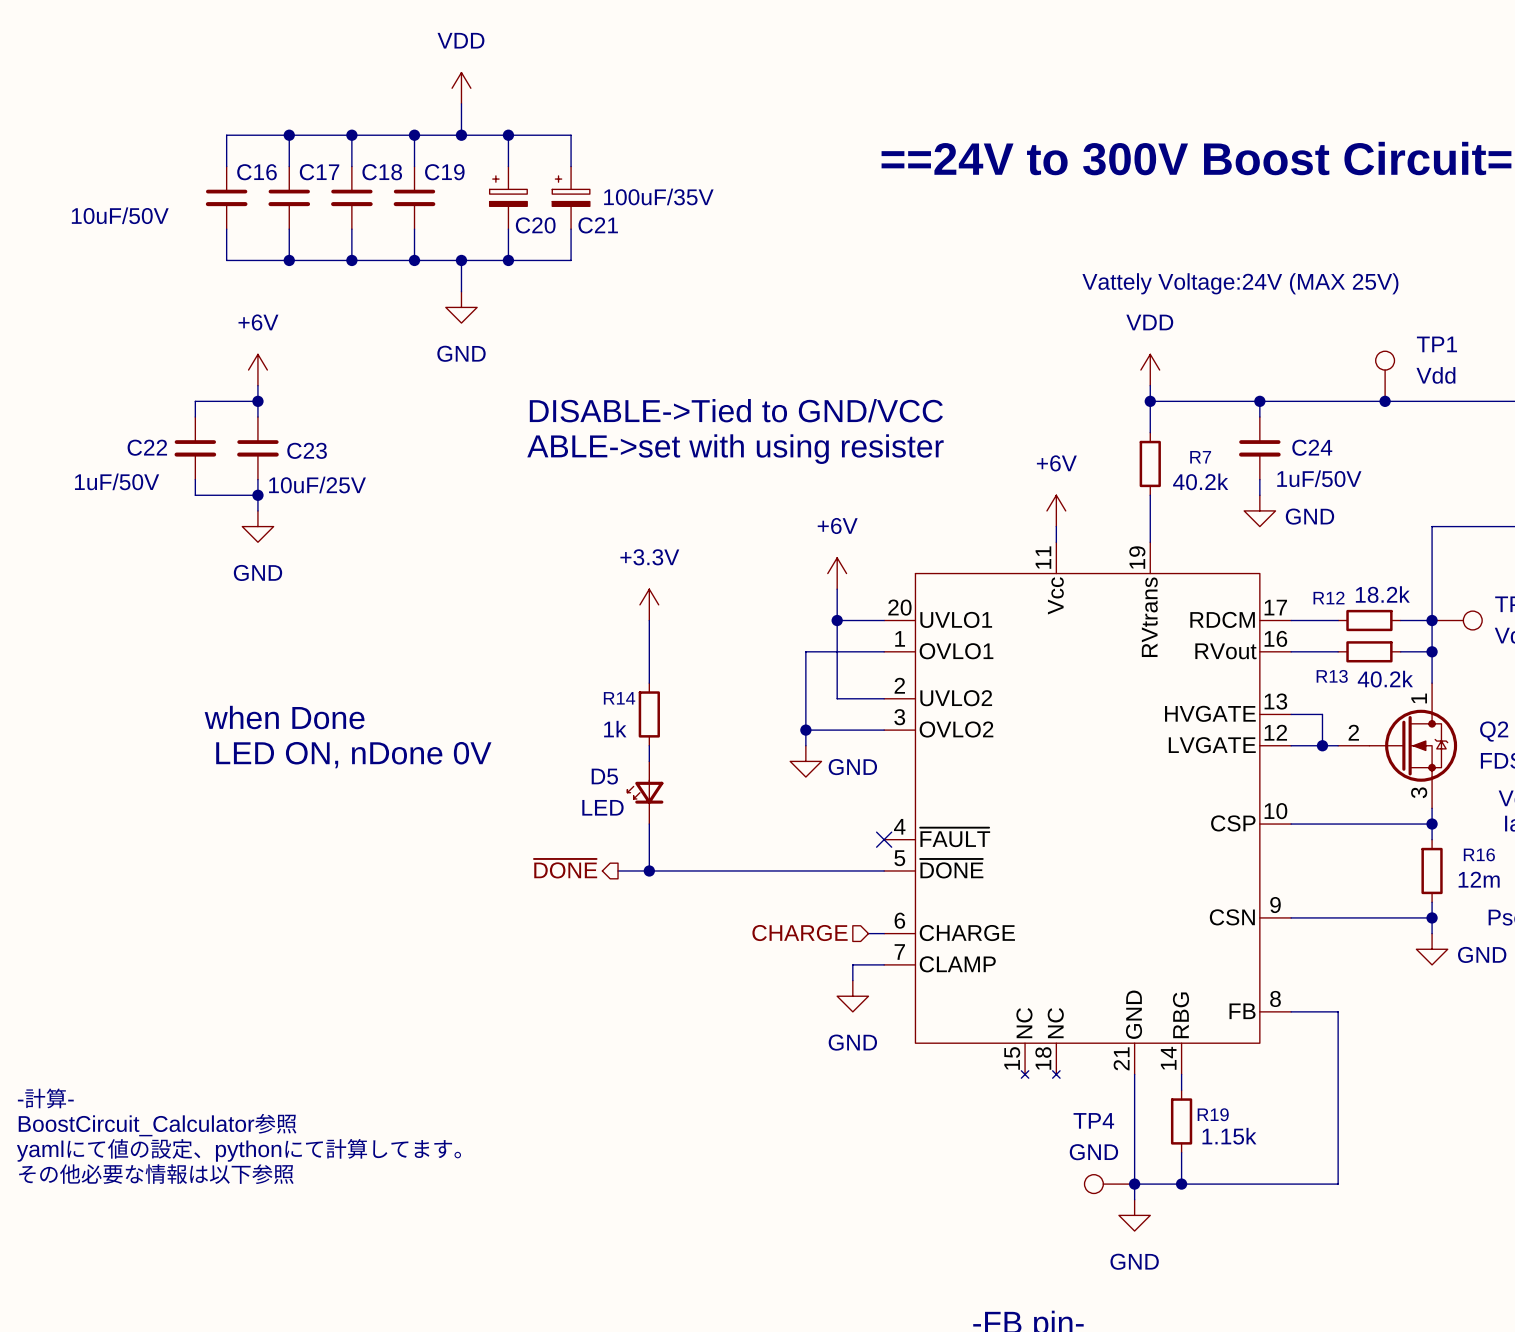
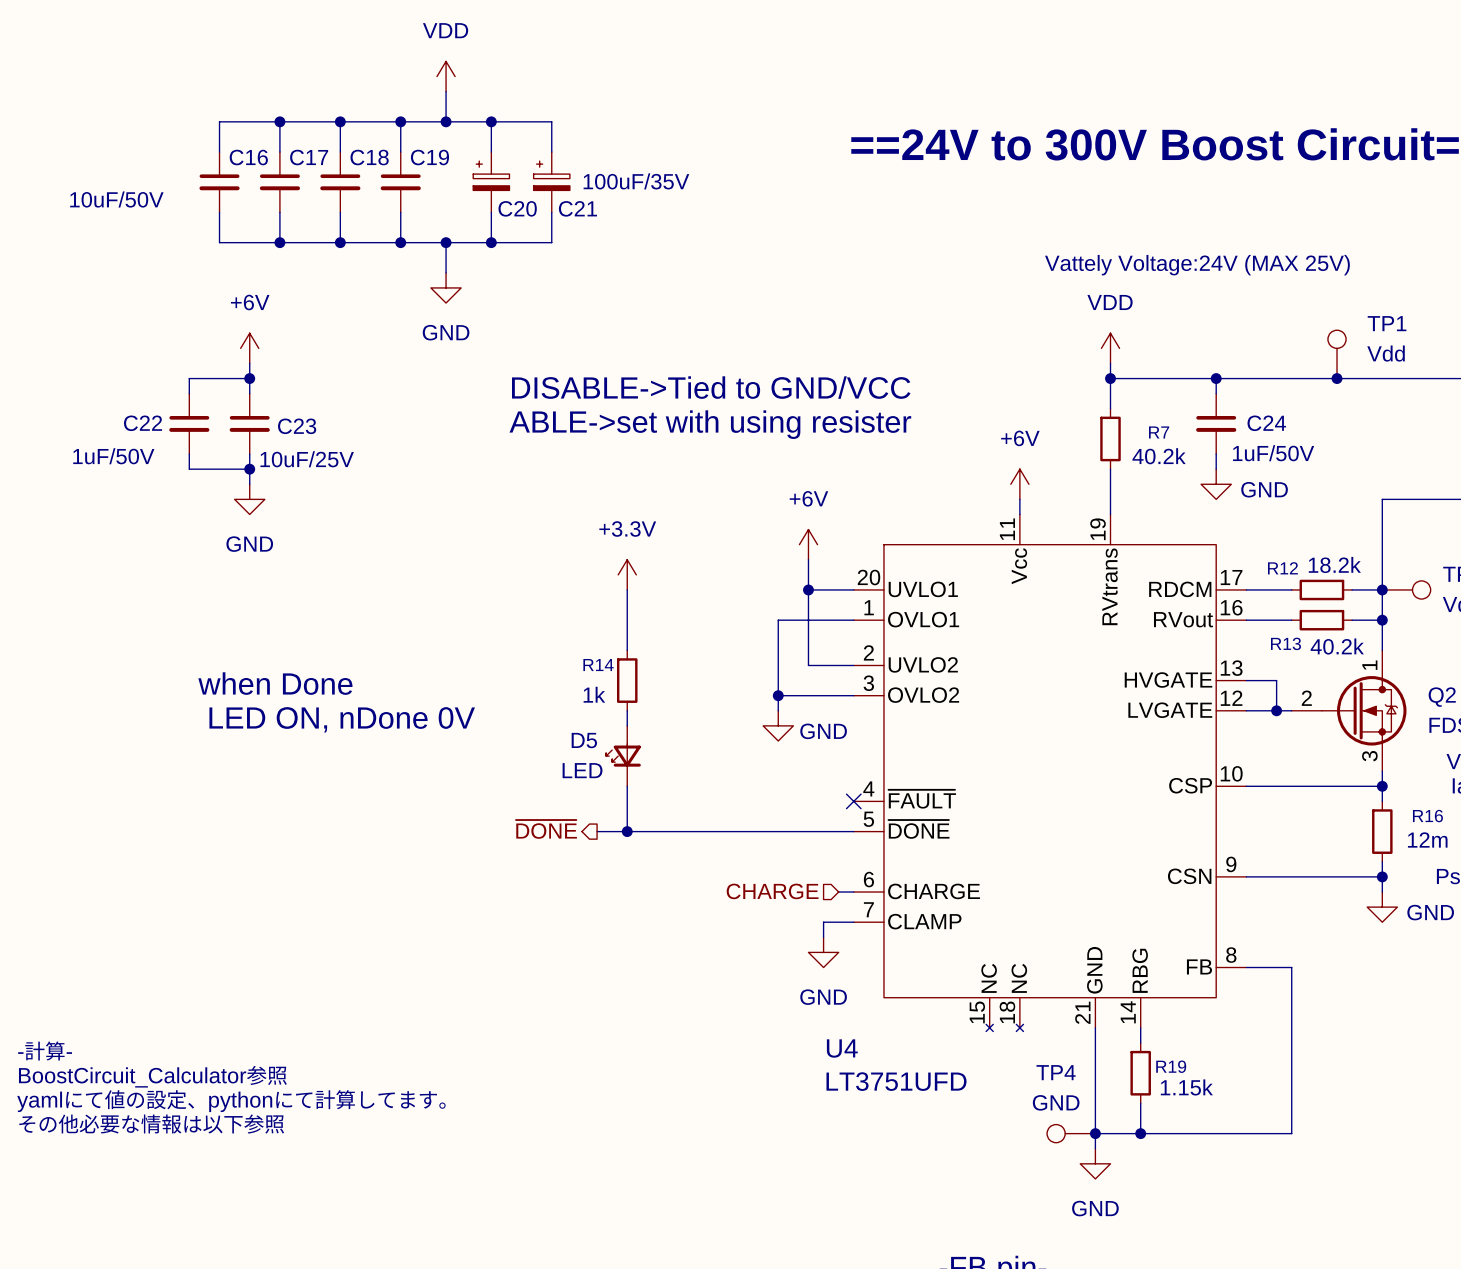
U4 name: none -> U4 (842, 1048)
U4 value: none -> LT3751UFD (896, 1081)

